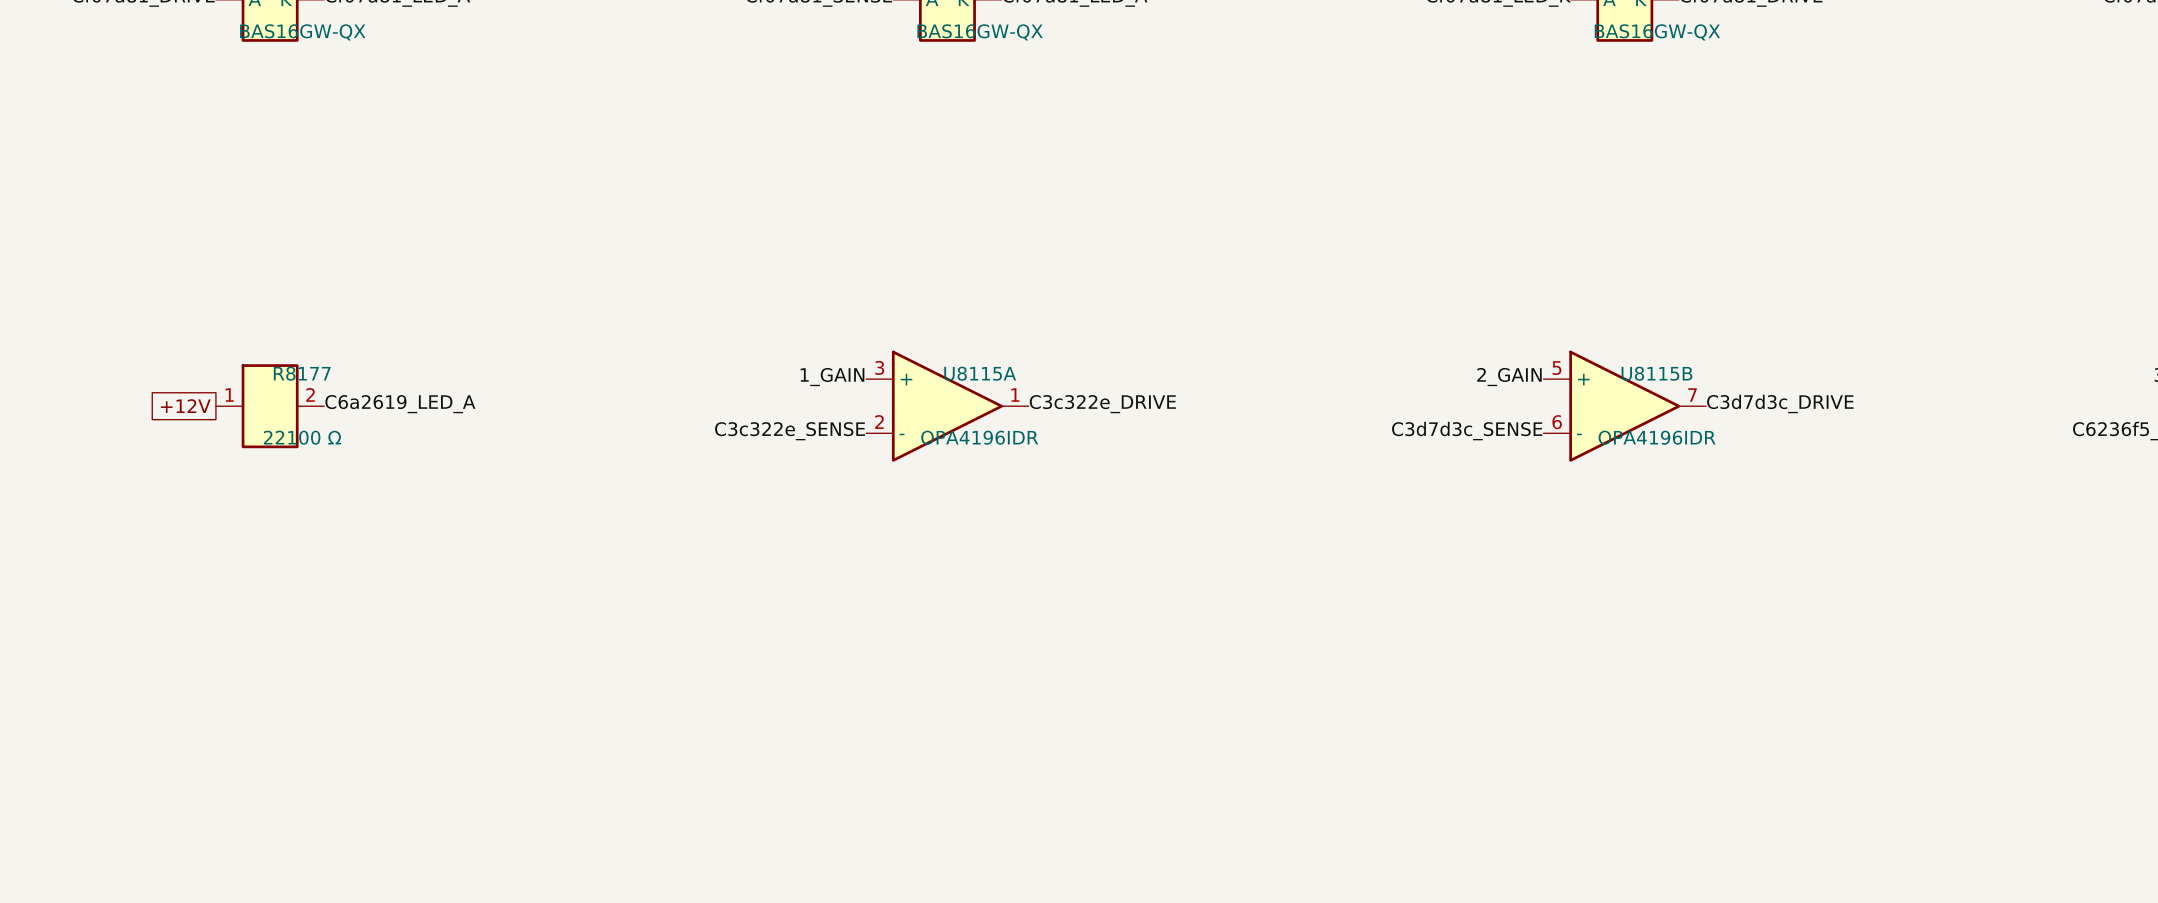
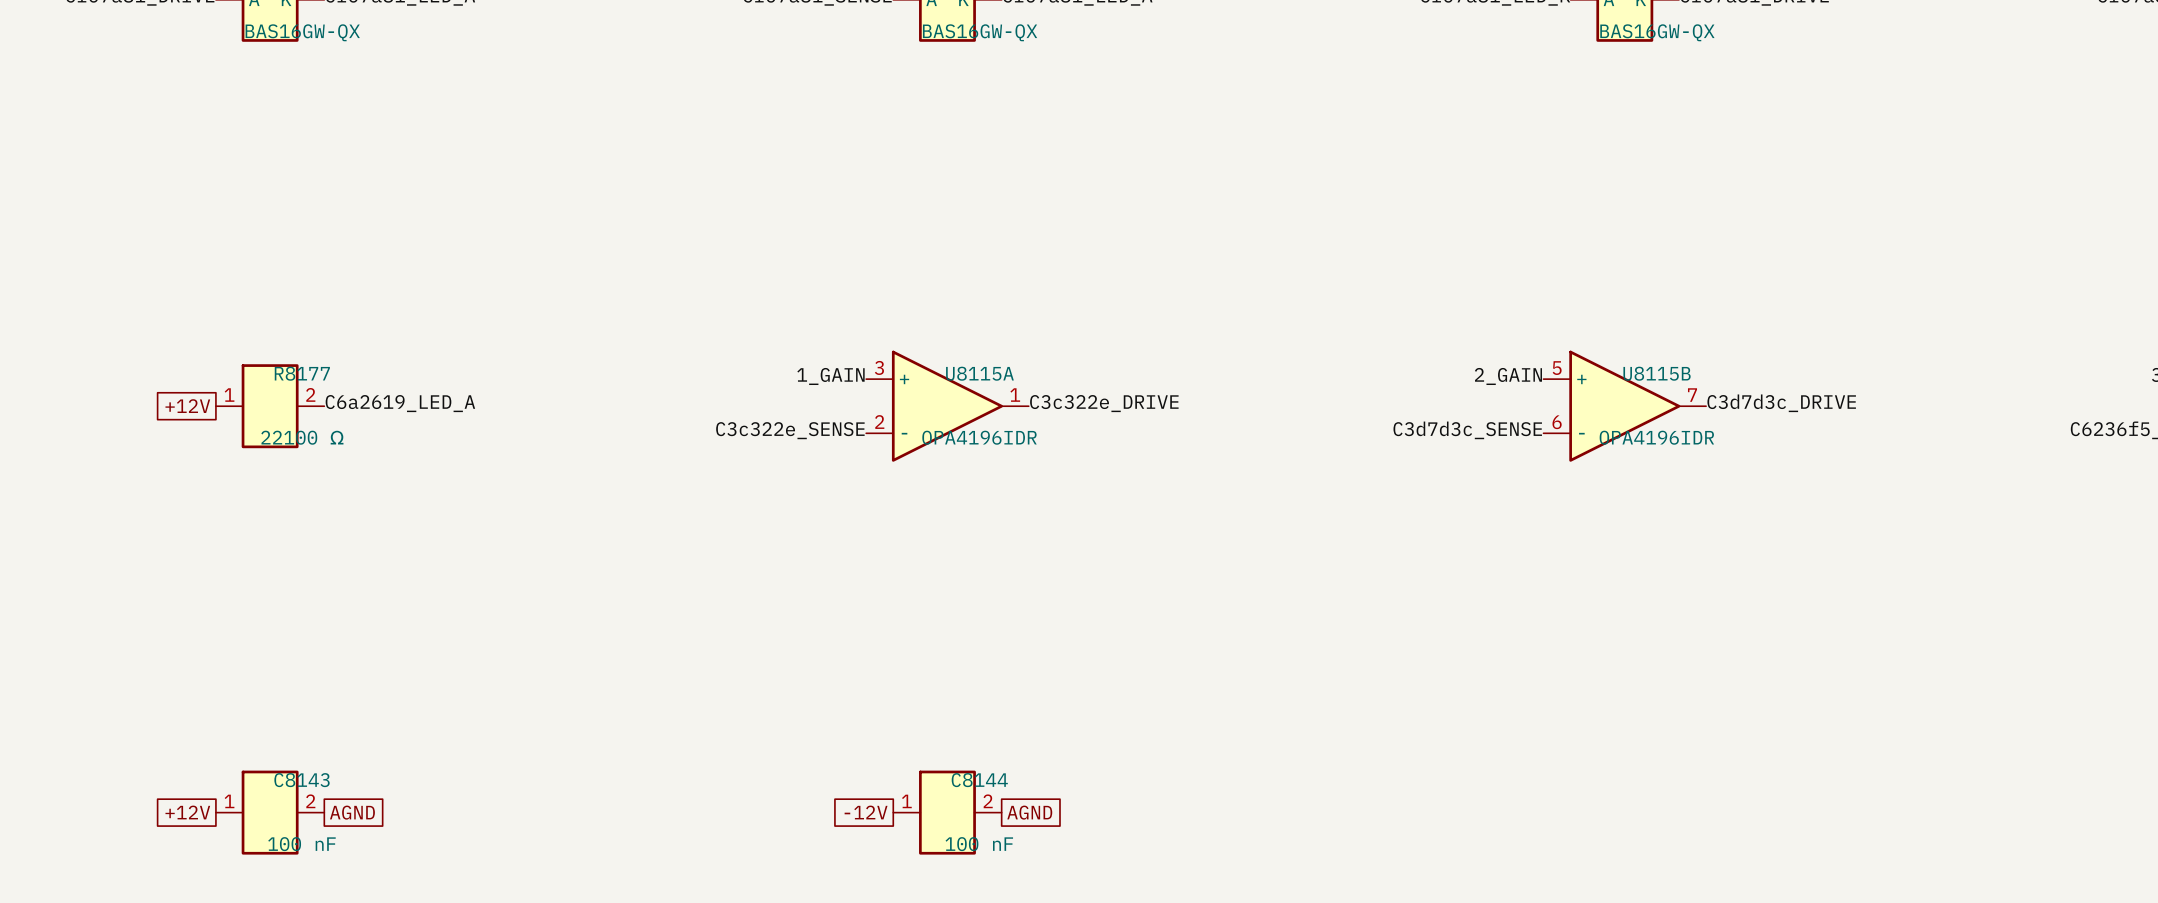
global label: none -> +12V (187, 812)
C8143: none -> 100 nF (270, 812)
global label: none -> AGND (352, 812)
global label: none -> -12V (866, 812)
C8144: none -> 100 nF (947, 812)
global label: none -> AGND (1029, 812)

